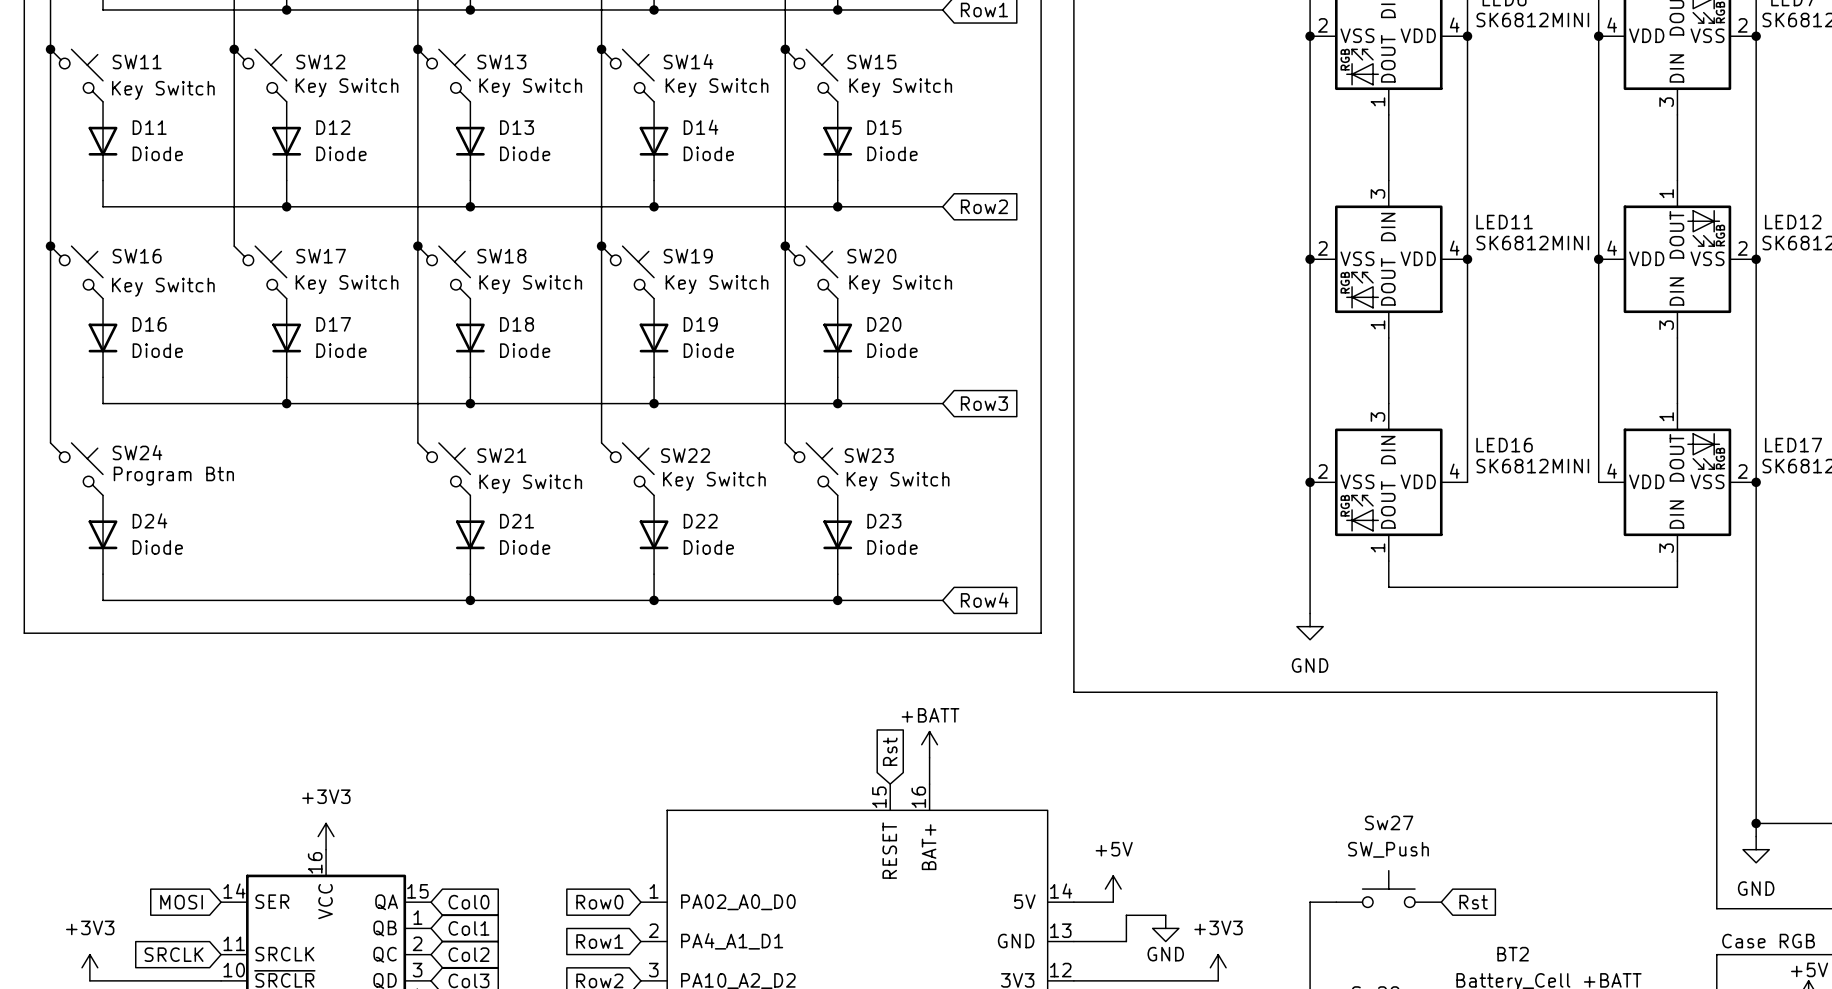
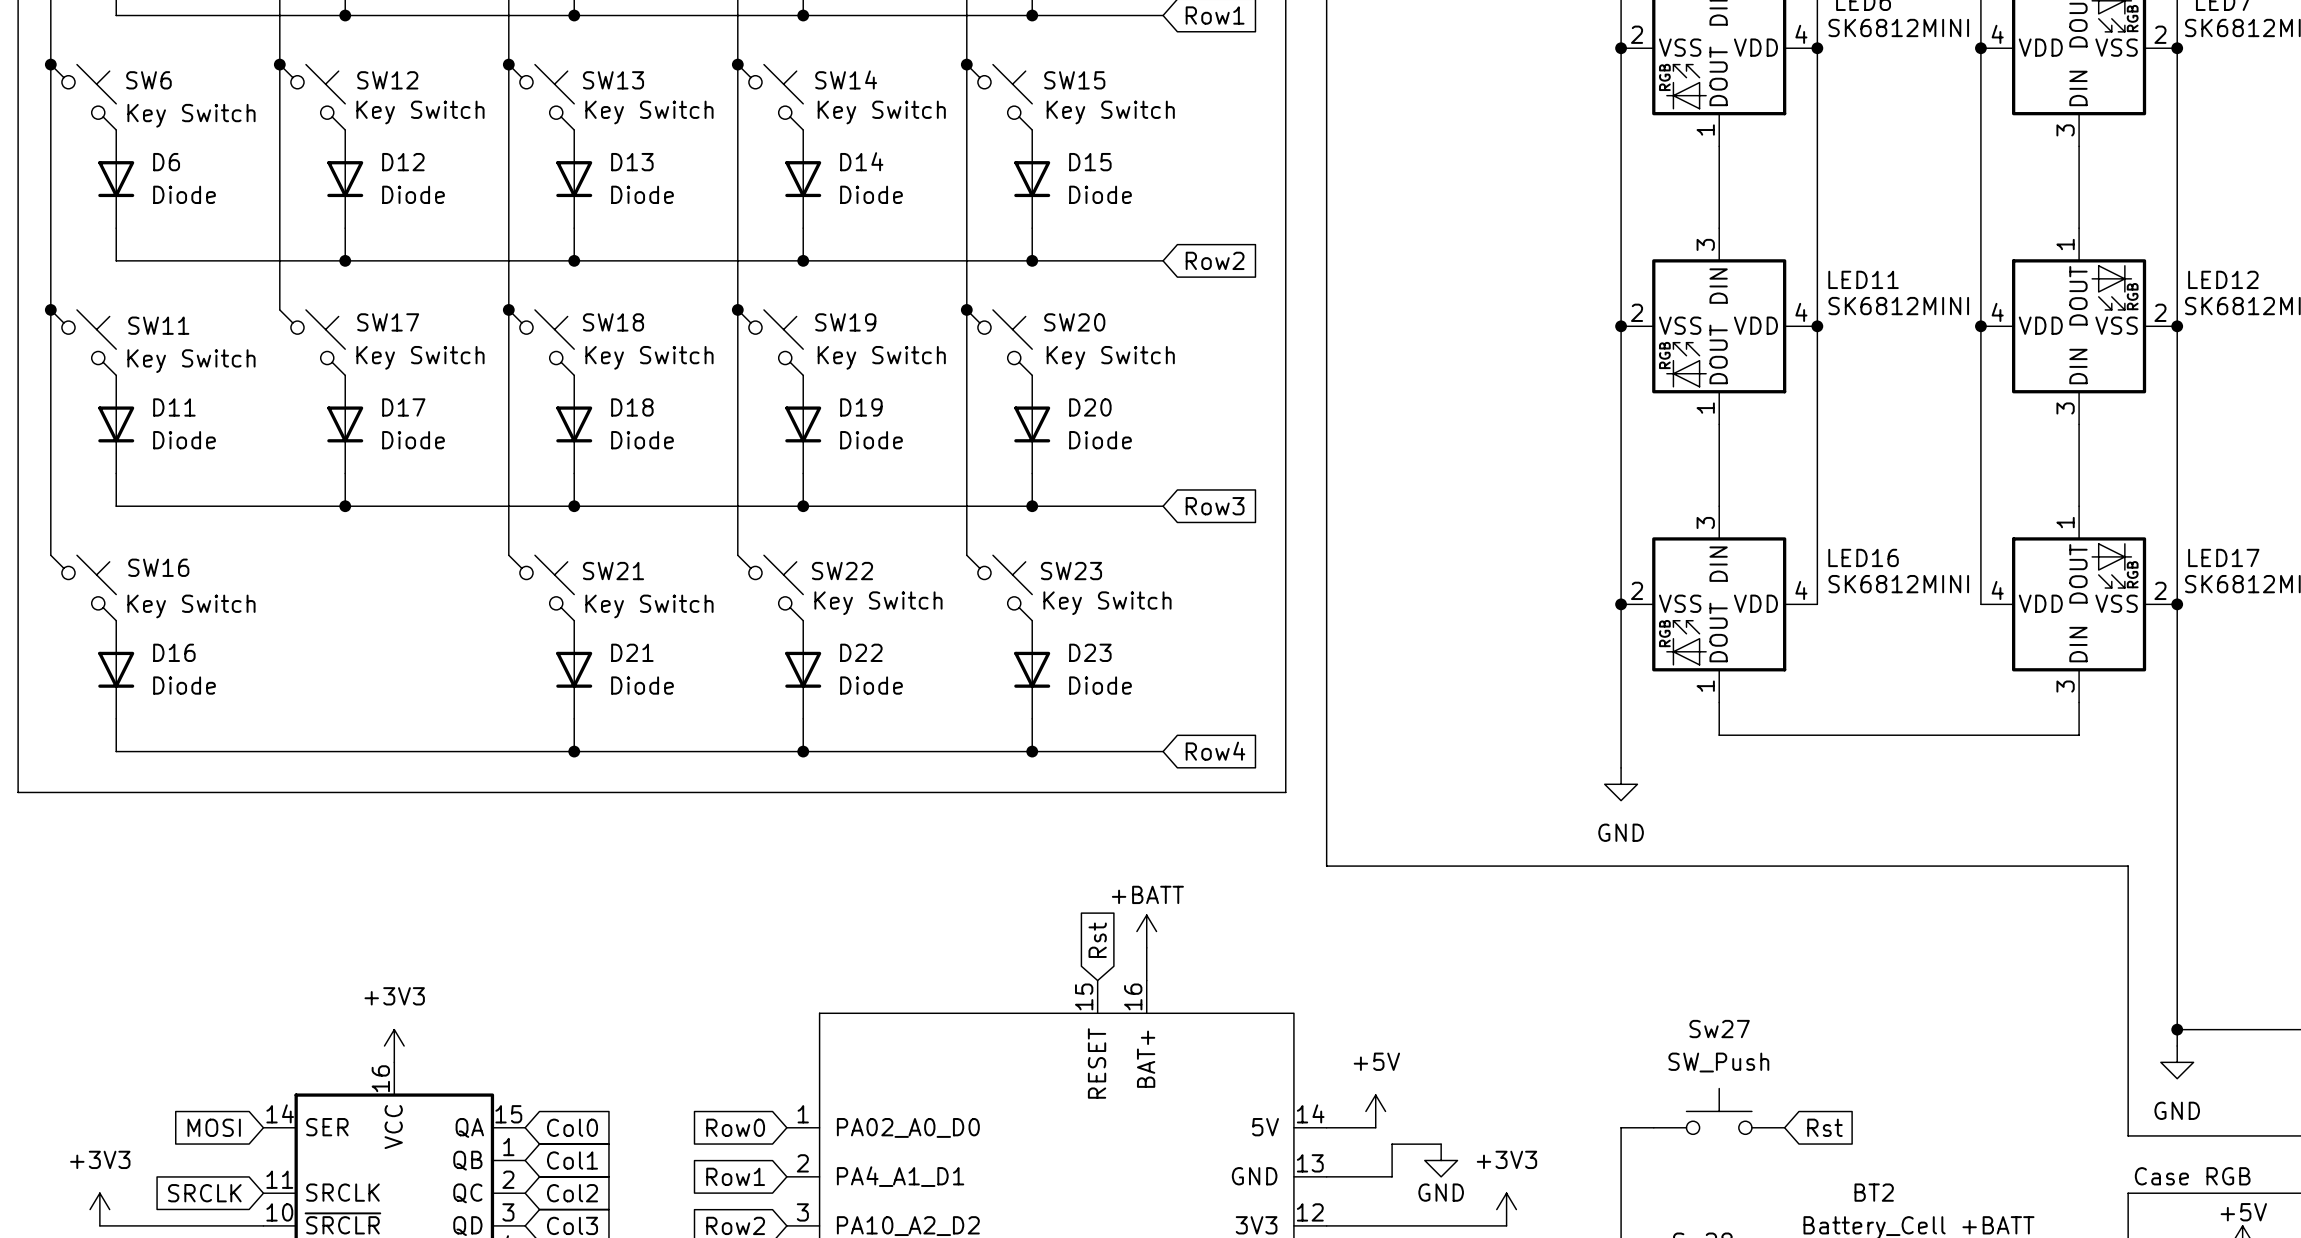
SW11 name: SW11 (137, 61) -> SW6 (148, 80)
D11 name: D11 (149, 127) -> D6 (166, 162)
SW16 name: SW16 (137, 256) -> SW11 (158, 325)
D16 name: D16 (149, 324) -> D11 (174, 407)
SW24 name: SW24 (137, 452) -> SW16 (158, 567)
SW24 value: Program Btn (173, 476) -> Key Switch (191, 606)
D24 name: D24 (149, 520) -> D16 (174, 652)

